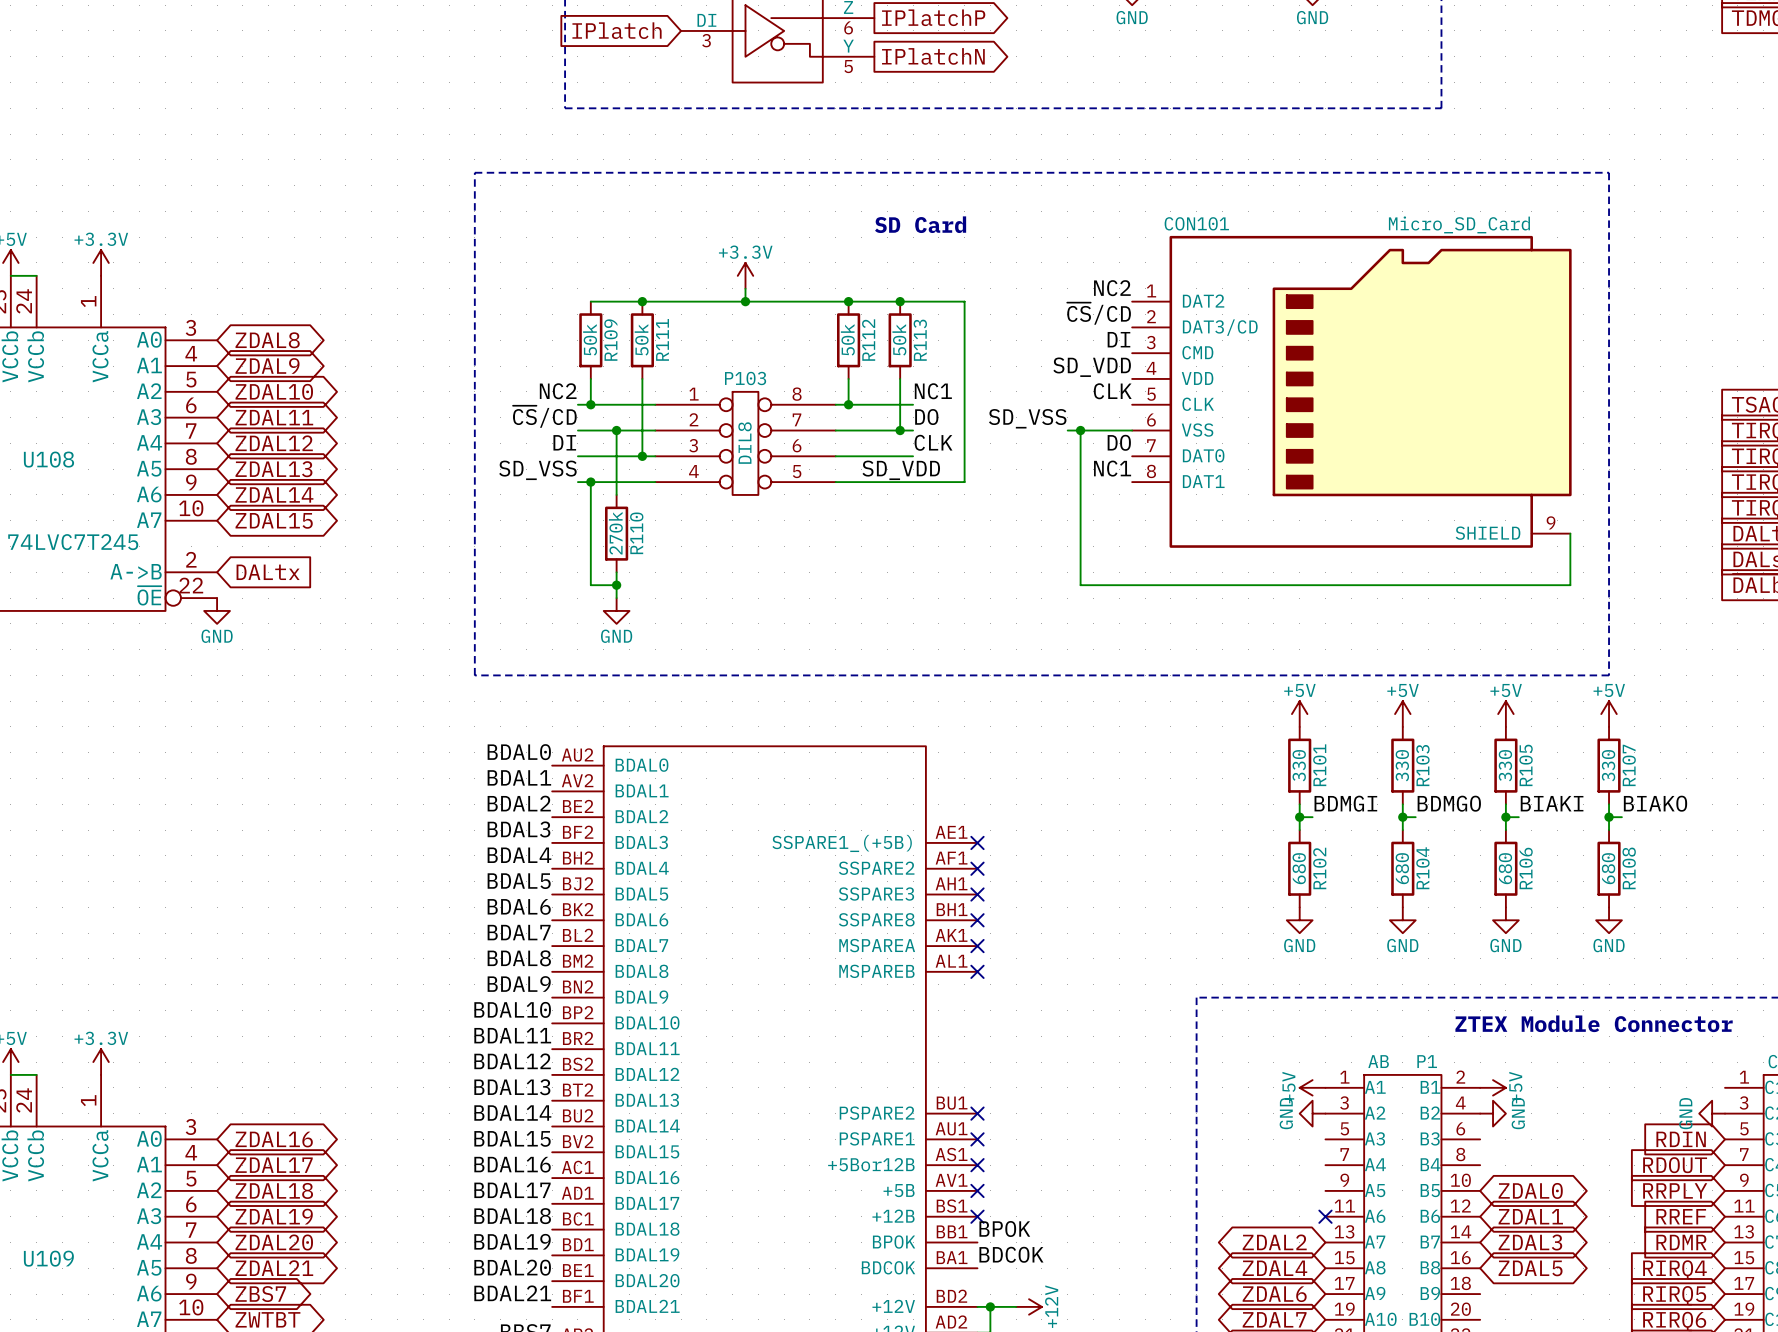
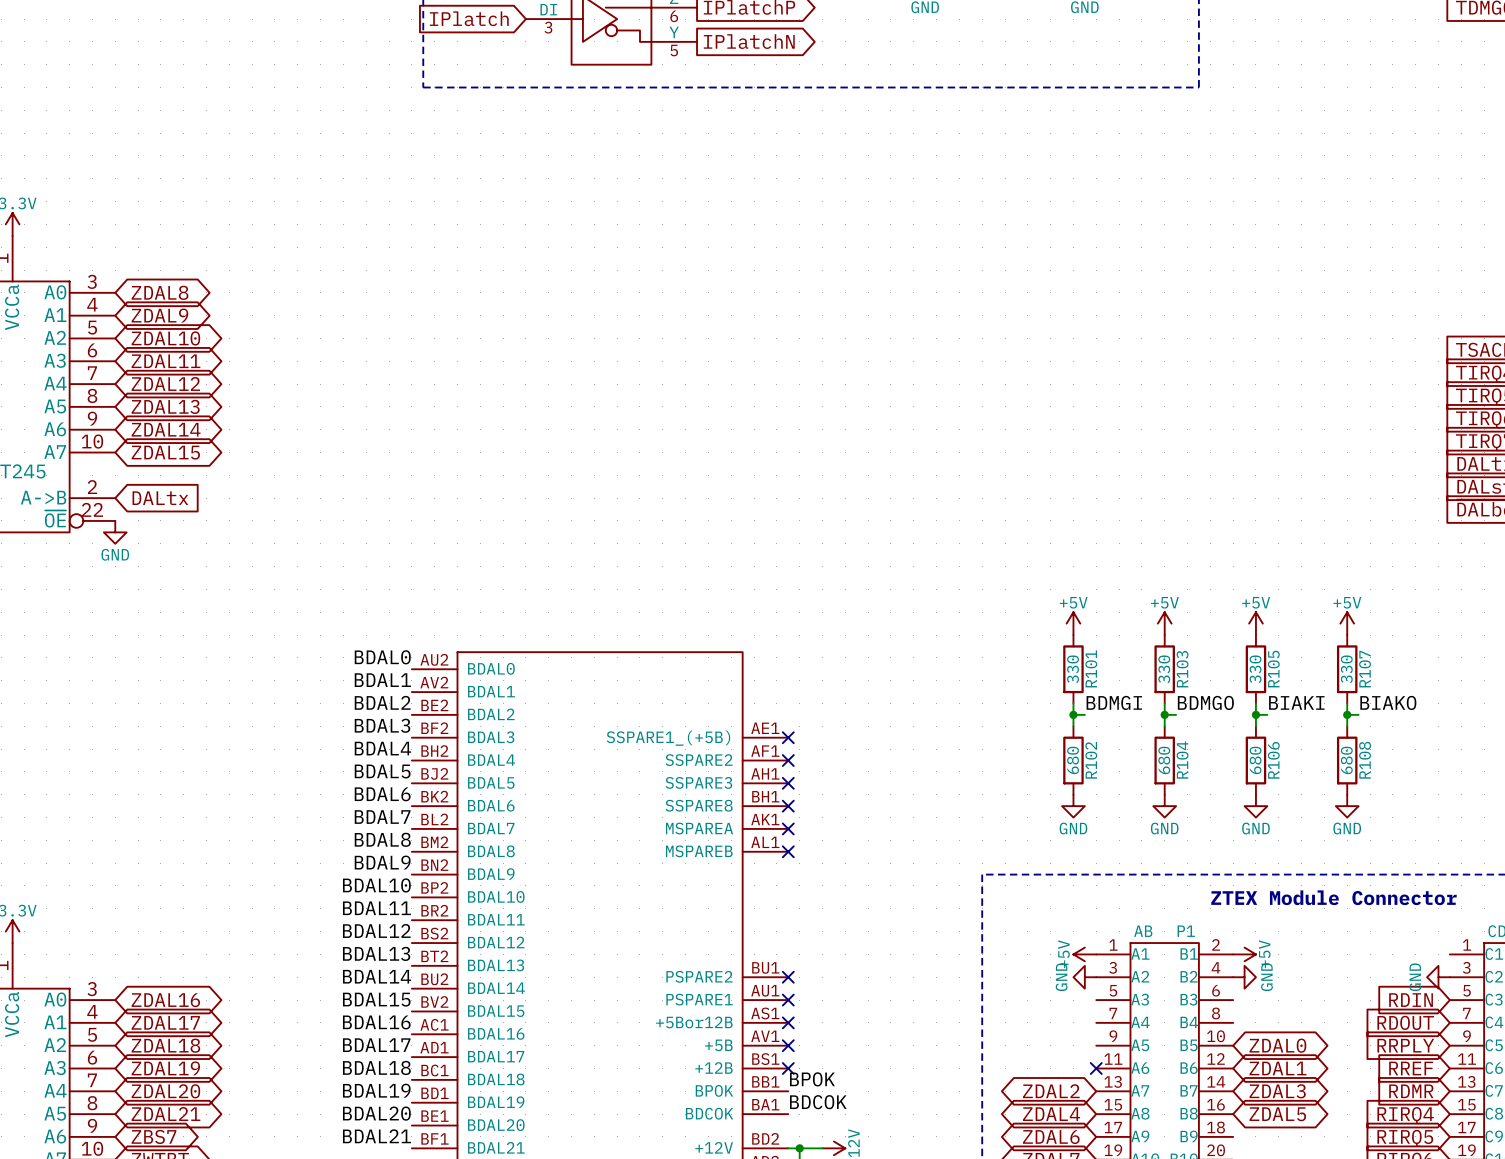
line: (474, 172) (1609, 172) (1609, 675) (474, 675) (474, 172) -> none
text: SD Card (920, 224) -> none
power symbol: +3.3V (745, 275) -> none
wire: (745, 288) (745, 301) -> none
label: NC2 (1112, 288) -> none
wire: (590, 301) (964, 301) (964, 482) (835, 482) -> none
junction: (642, 301) -> none
junction: (745, 301) -> none
junction: (848, 301) -> none
junction: (900, 301) -> none
label: ~{CS}/CD (1099, 313) -> none
label: DI (1118, 339) -> none
R109: 50k (590, 340) -> none
R111: 50k (642, 340) -> none
R112: 50k (848, 340) -> none
R113: 50k (900, 340) -> none
label: SD_VDD (1092, 367) -> none
wire: (590, 378) (590, 404) -> none
wire: (642, 378) (642, 456) -> none
wire: (848, 378) (848, 404) -> none
wire: (900, 378) (900, 430) -> none
label: NC2 (558, 391) -> none
label: NC1 (933, 391) -> none
label: CLK (1112, 391) -> none
CON101: Micro_SD_Card (1351, 391) -> none
wire: (577, 404) (655, 404) -> none
junction: (590, 404) -> none
wire: (835, 404) (913, 404) -> none
junction: (848, 404) -> none
label: ~{CS}/CD (544, 416) -> none
label: DO (926, 417) -> none
label: SD_VSS (1027, 418) -> none
wire: (577, 430) (655, 430) -> none
wire: (616, 430) (616, 494) -> none
junction: (616, 430) -> none
wire: (835, 430) (913, 430) -> none
junction: (900, 430) -> none
wire: (1067, 430) (1132, 430) -> none
wire: (1080, 430) (1080, 585) (1570, 585) (1570, 533) -> none
junction: (1080, 430) -> none
label: DI (564, 442) -> none
label: CLK (933, 442) -> none
label: DO (1119, 442) -> none
P103: DIL8 (745, 443) -> none
wire: (577, 456) (655, 456) -> none
junction: (642, 456) -> none
wire: (835, 456) (913, 456) -> none
label: NC1 (1112, 468) -> none
label: SD_VSS (537, 470) -> none
label: SD_VDD (901, 470) -> none
wire: (577, 482) (655, 482) -> none
wire: (590, 482) (590, 585) (616, 585) -> none
junction: (590, 482) -> none
R110: 270k (616, 533) -> none
wire: (616, 572) (616, 598) -> none
junction: (616, 585) -> none
power symbol: GND (616, 610) -> none

